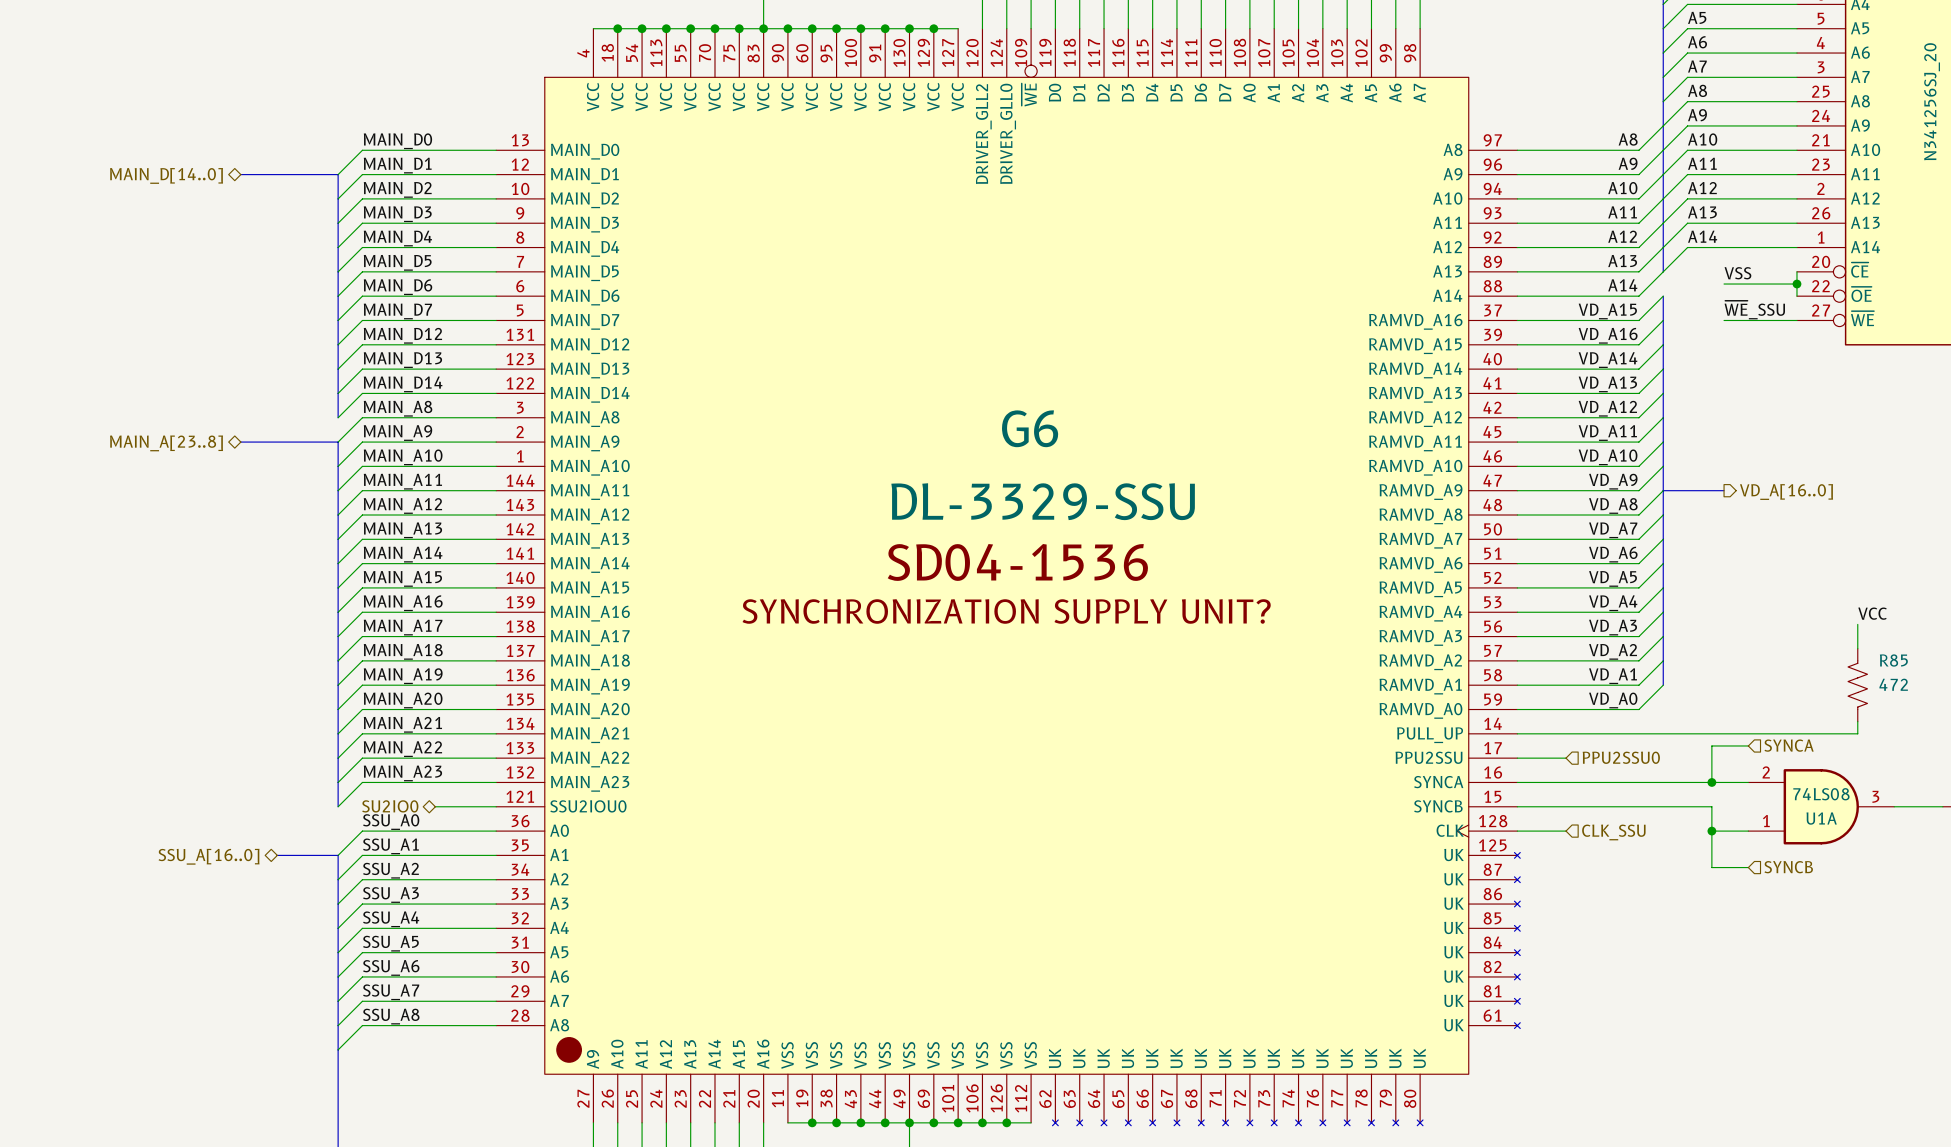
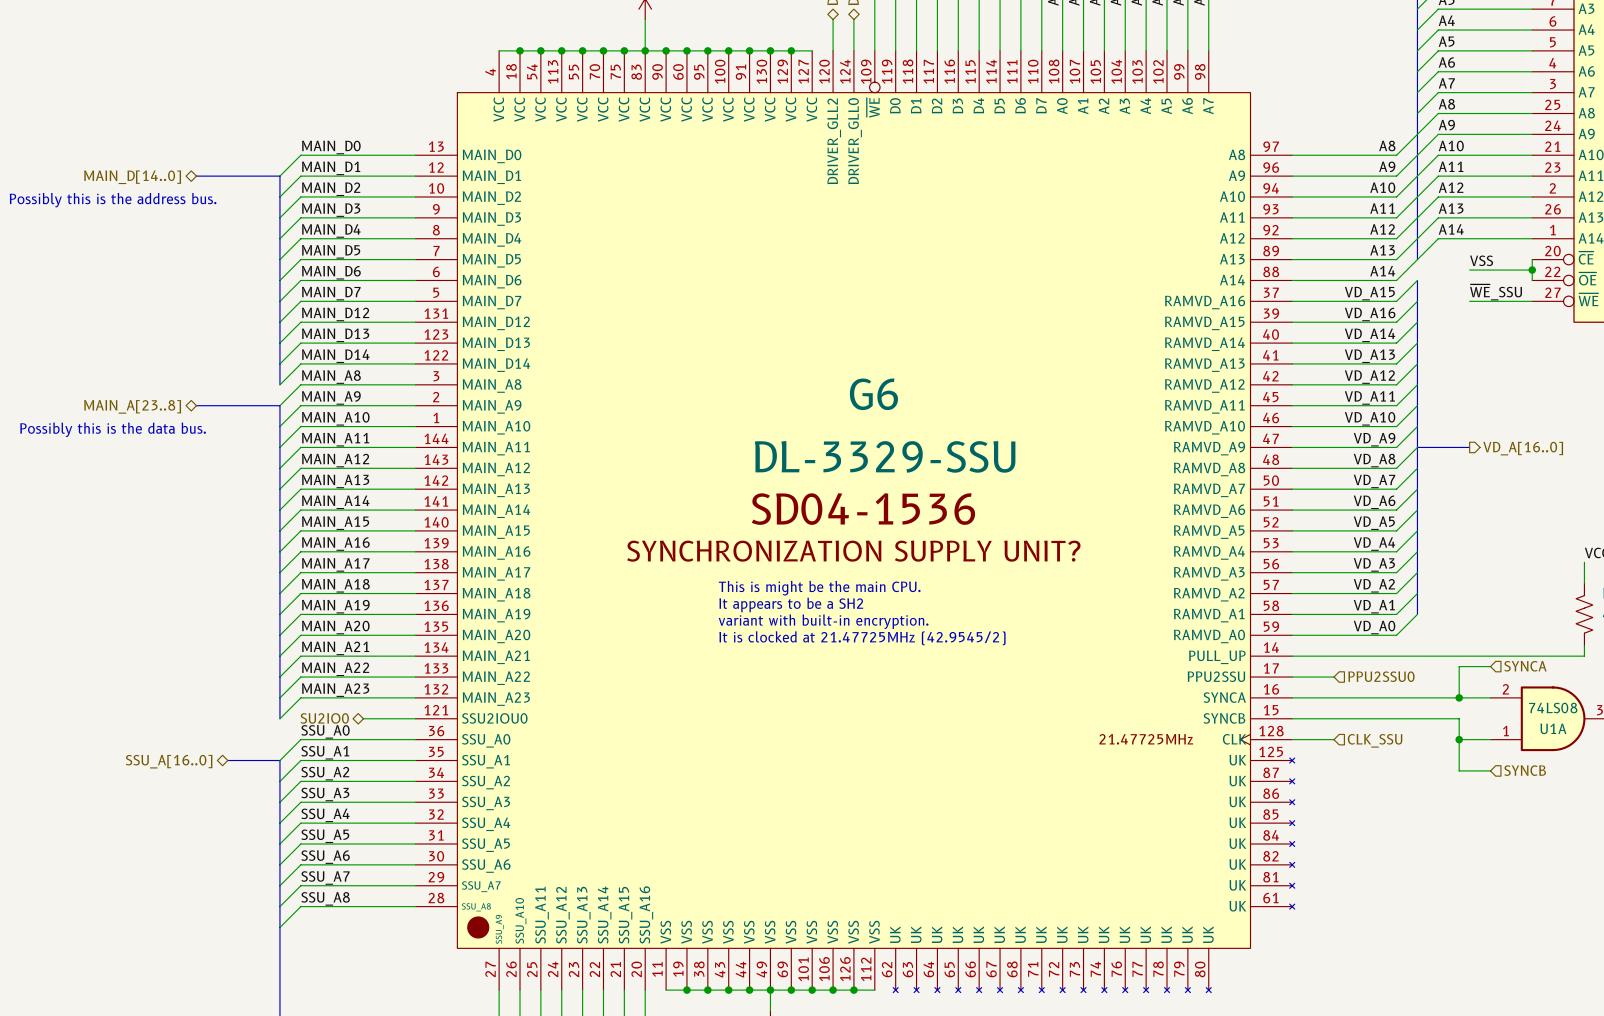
G6 symbol: [496, 28, 1521, 1126] -> [415, 50, 1295, 993]
text: none -> Possibly this is the address bus. (113, 200)
text: none -> Possibly this is the data bus. (113, 429)
text: none -> This is might be the main CPU. (819, 588)
text: none -> It appears to be a SH2 (791, 604)
text: none -> variant with built-in encryption. (823, 621)
text: none -> It is clocked at 21.47725MHz (42.9545/2) (862, 638)

